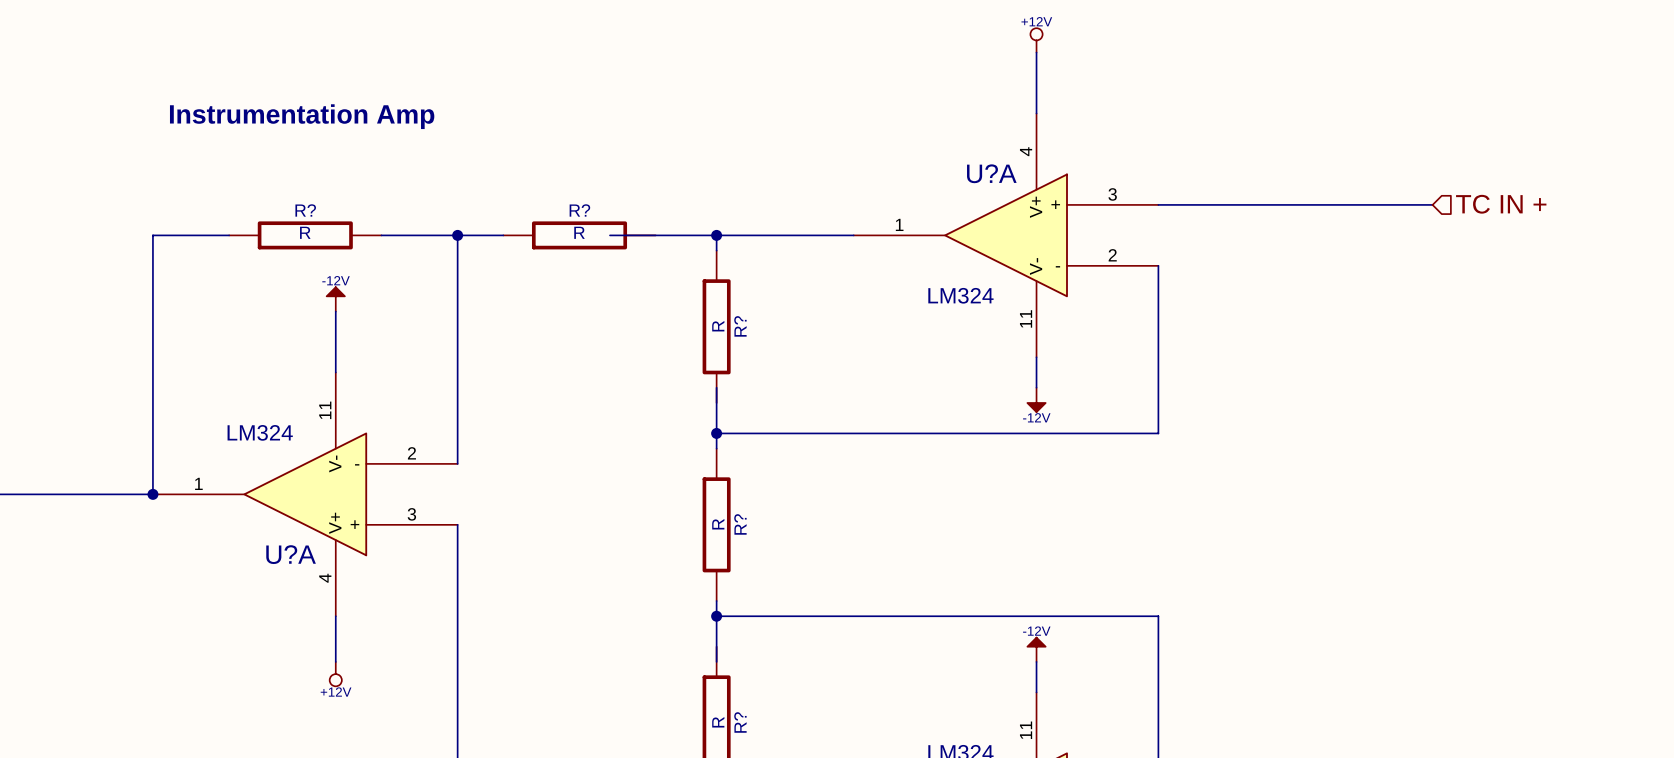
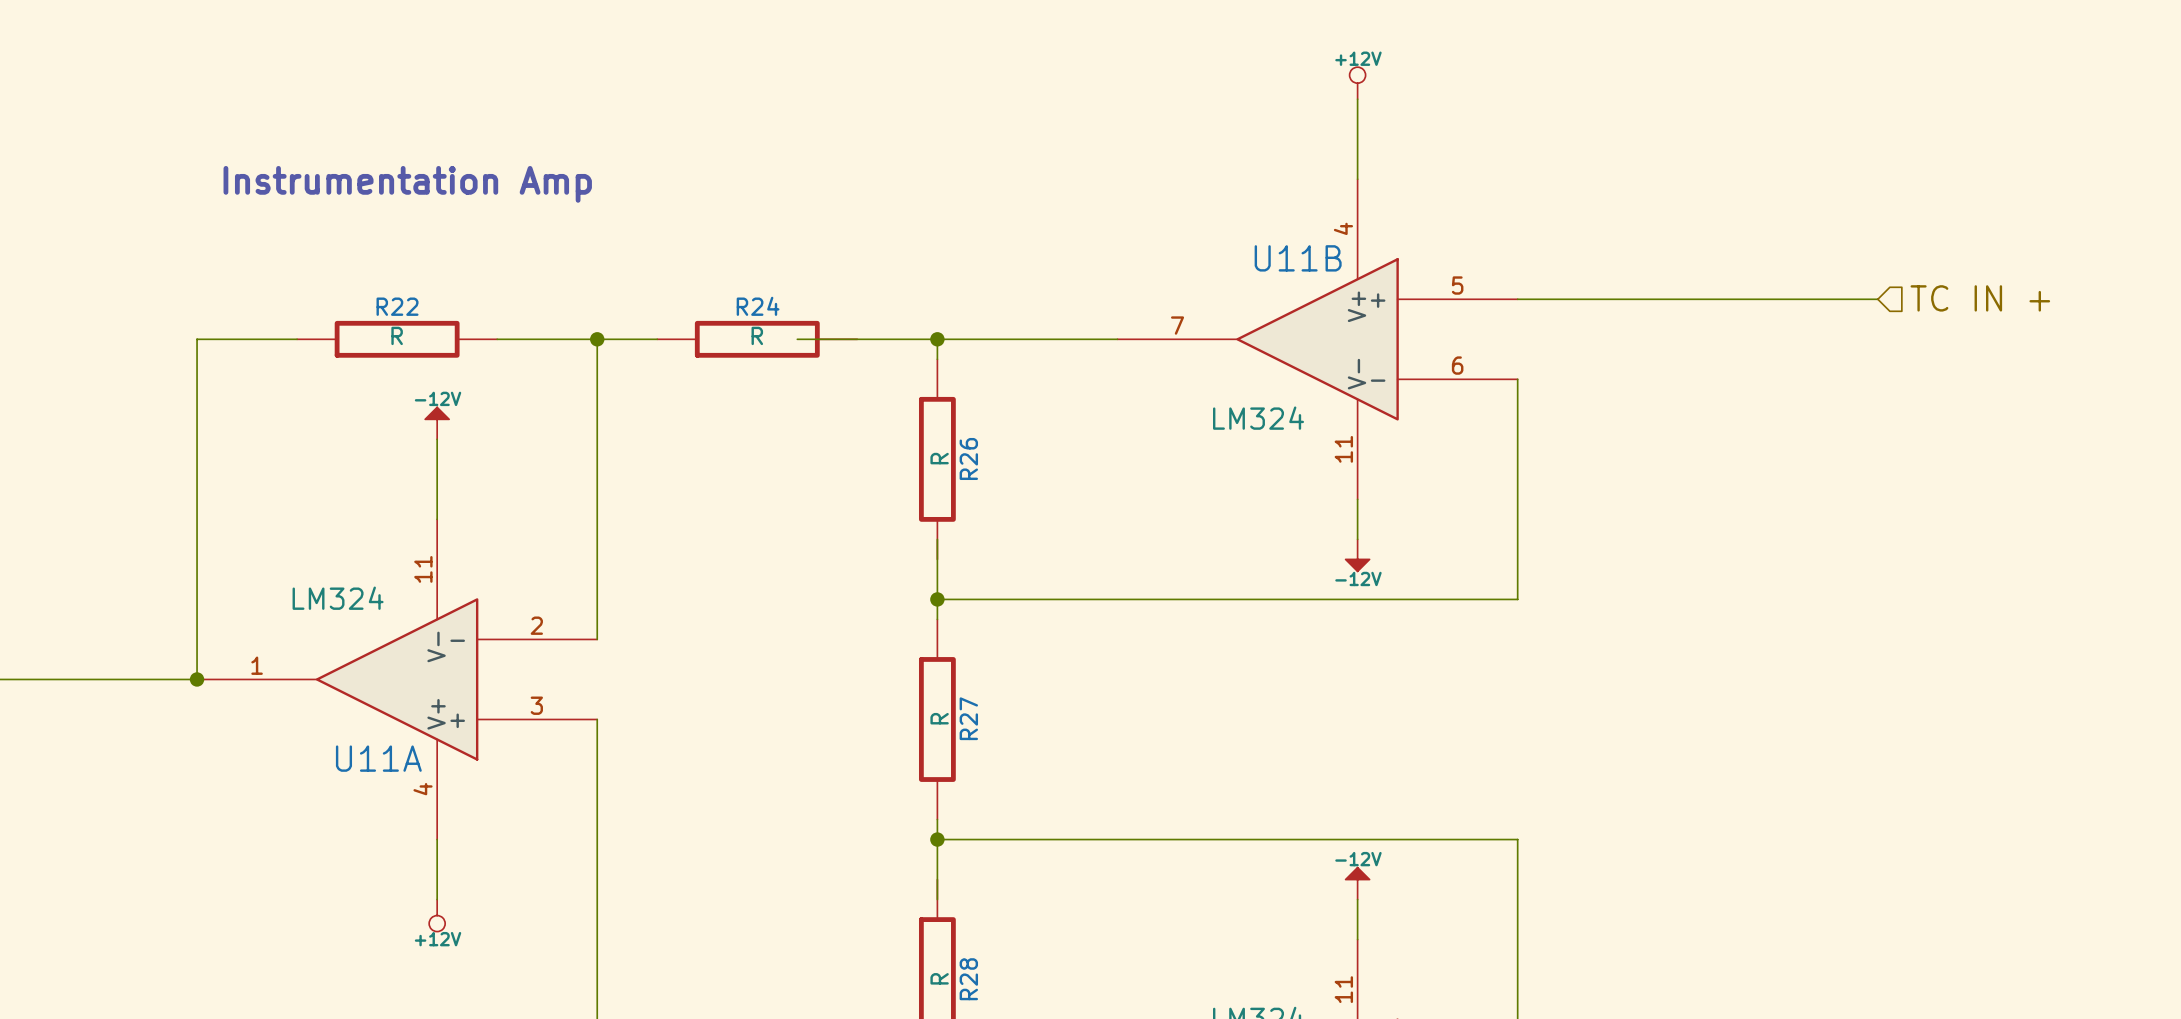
U?A name: U?A (991, 173) -> U11B (1298, 258)
U?A pin number: 3 (1112, 194) -> 5 (1457, 285)
R? name: R? (305, 210) -> R22 (397, 306)
R? name: R? (579, 210) -> R24 (758, 306)
U?A pin number: 1 (899, 224) -> 7 (1177, 325)
U?A pin number: 2 (1112, 255) -> 6 (1457, 365)
R? name: R? (740, 326) -> R26 (968, 458)
R? name: R? (740, 524) -> R27 (968, 718)
U?A name: U?A (291, 554) -> U11A (378, 758)
R? name: R? (740, 722) -> R28 (968, 979)

